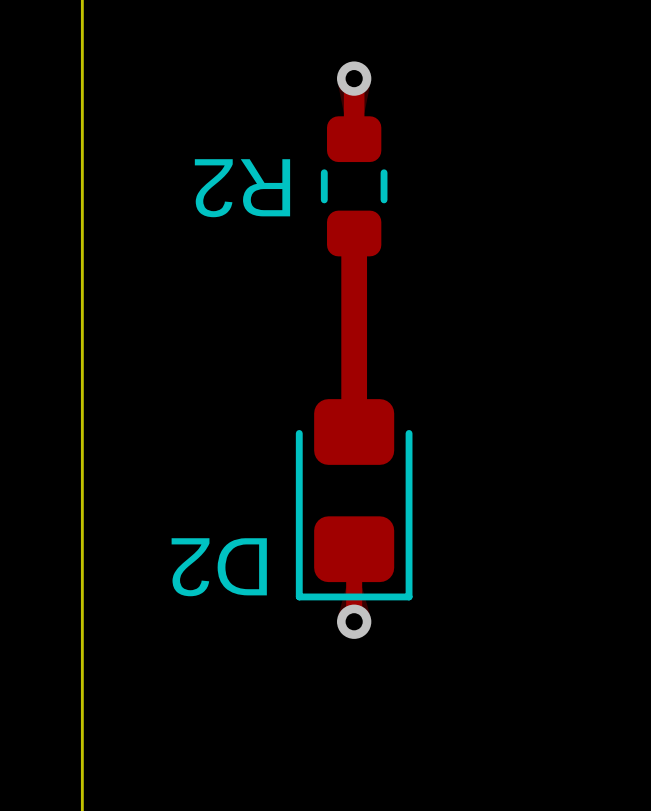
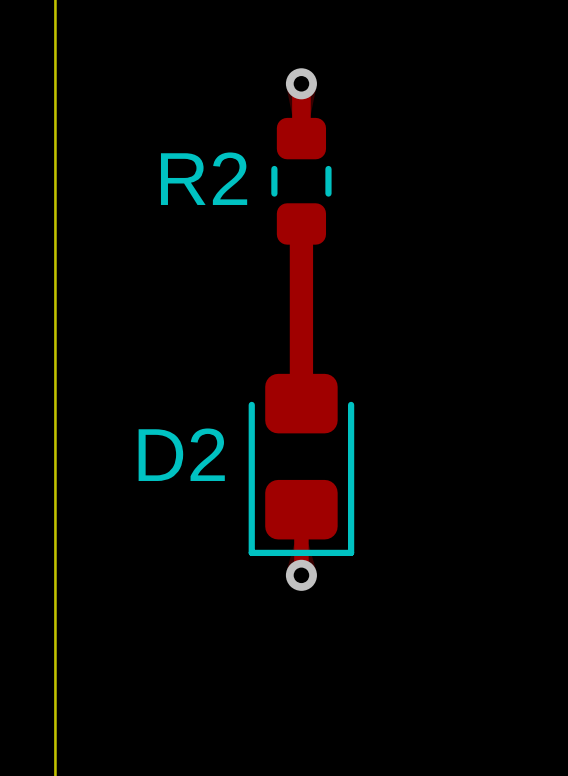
R2 name rotation: 0° (242, 188) -> 180° (204, 178)
D2 name rotation: 0° (219, 567) -> 180° (181, 454)

